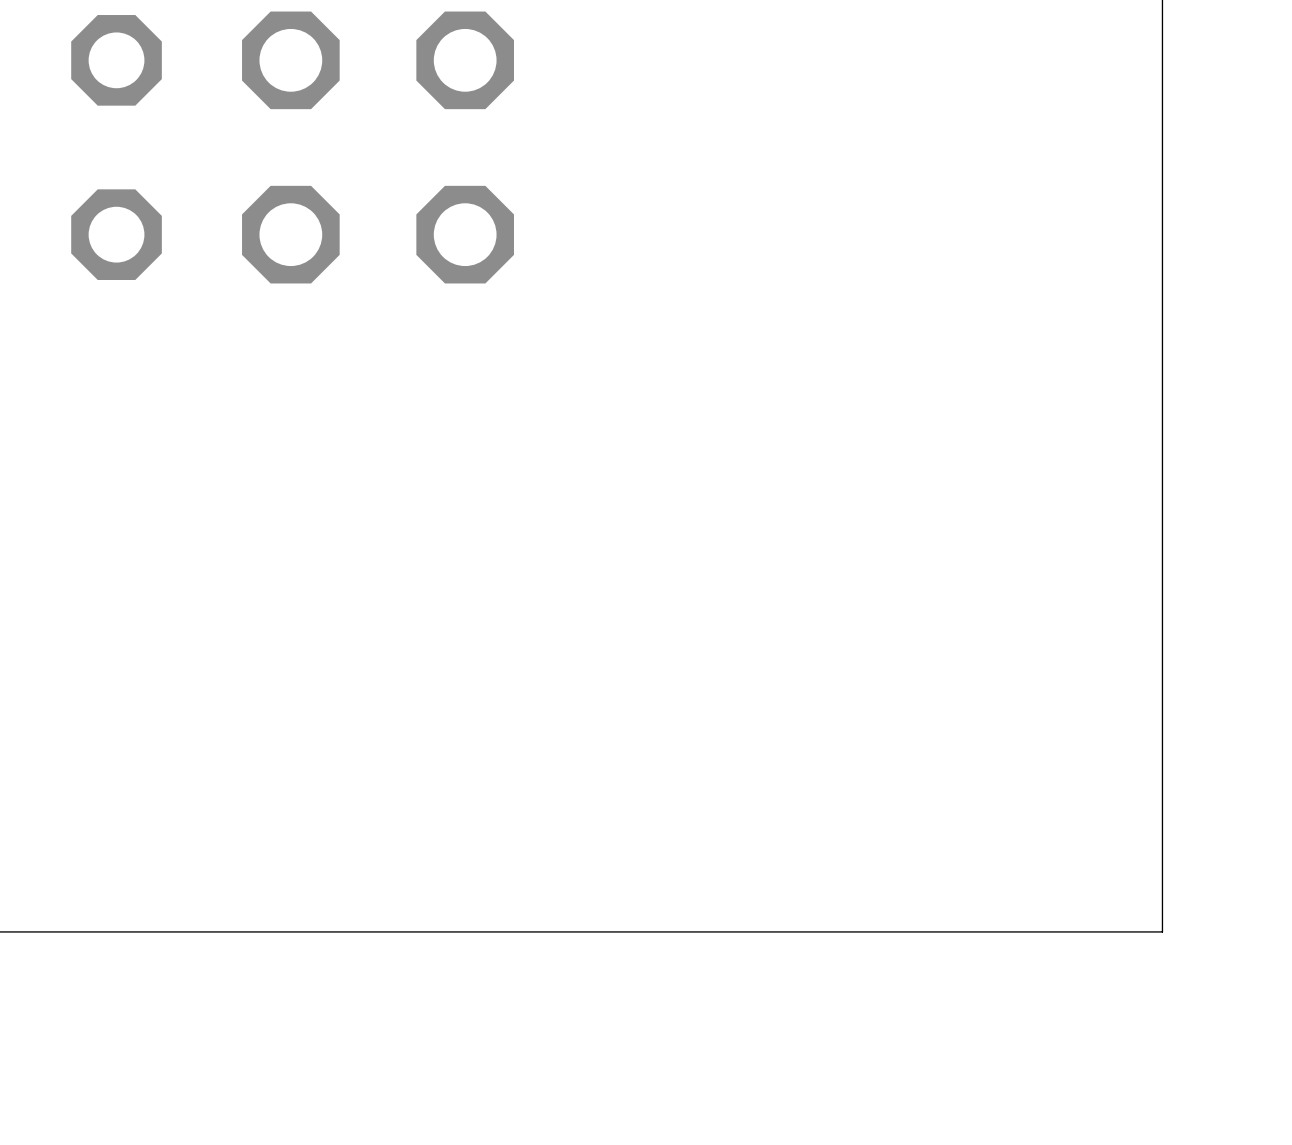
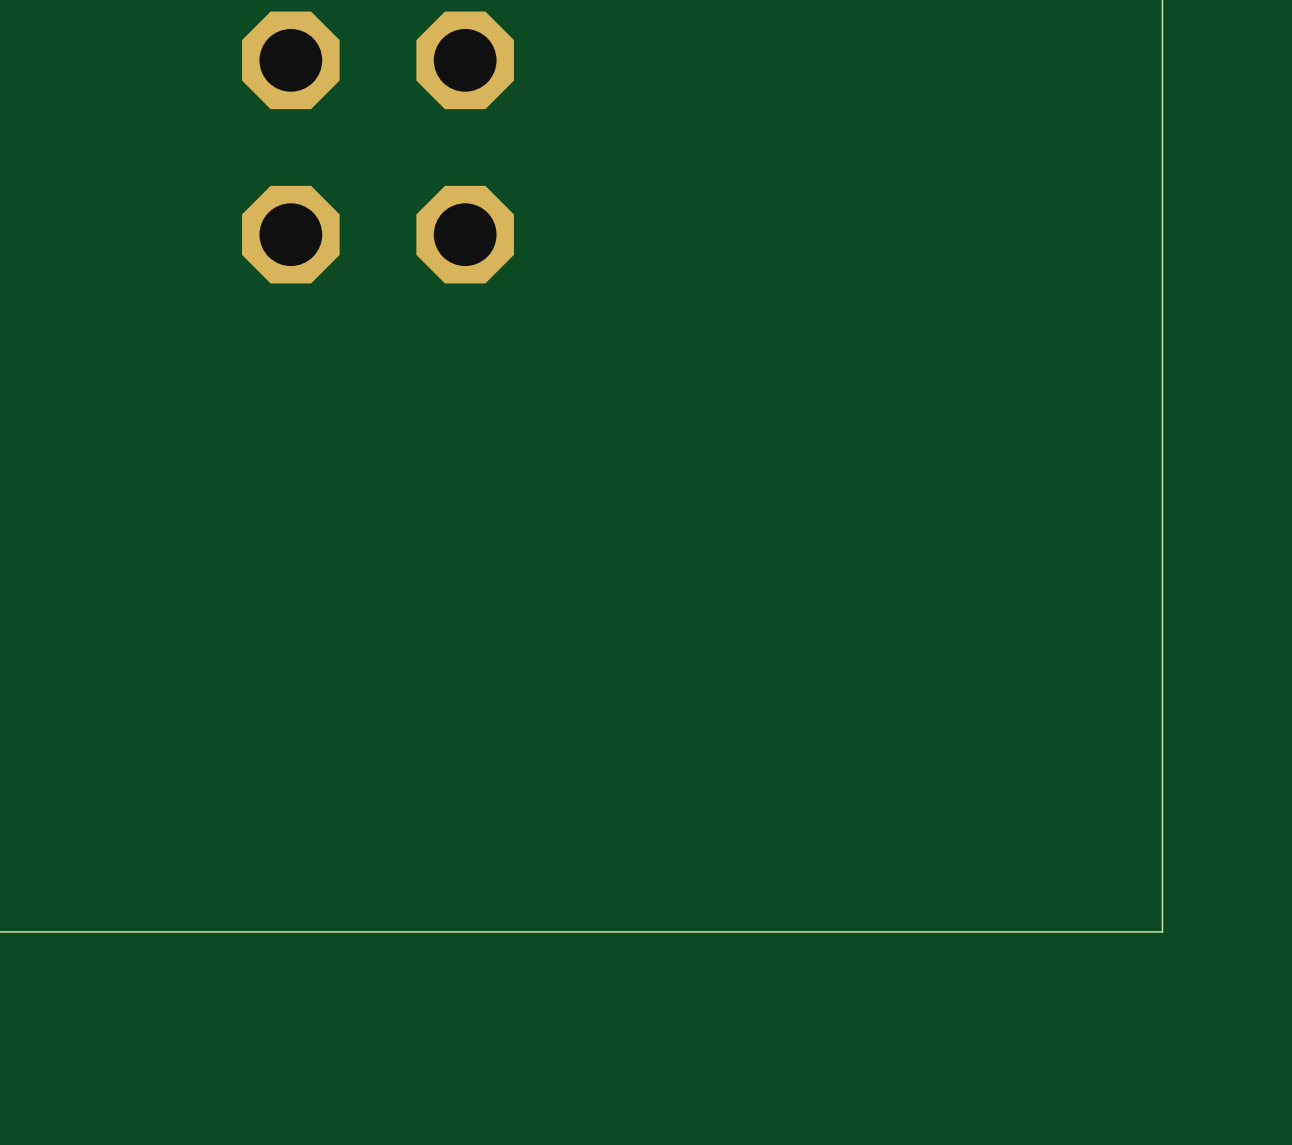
part: (116, 147) -> none

